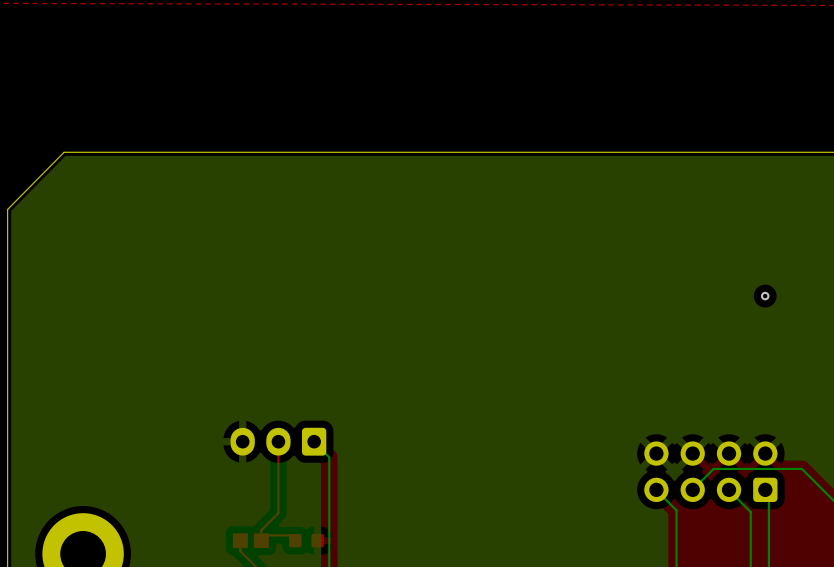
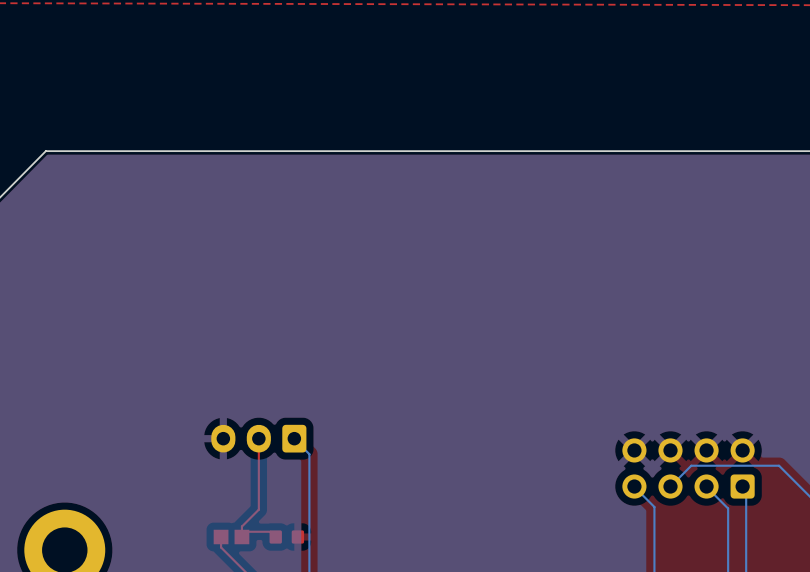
via: (765, 296) -> none

